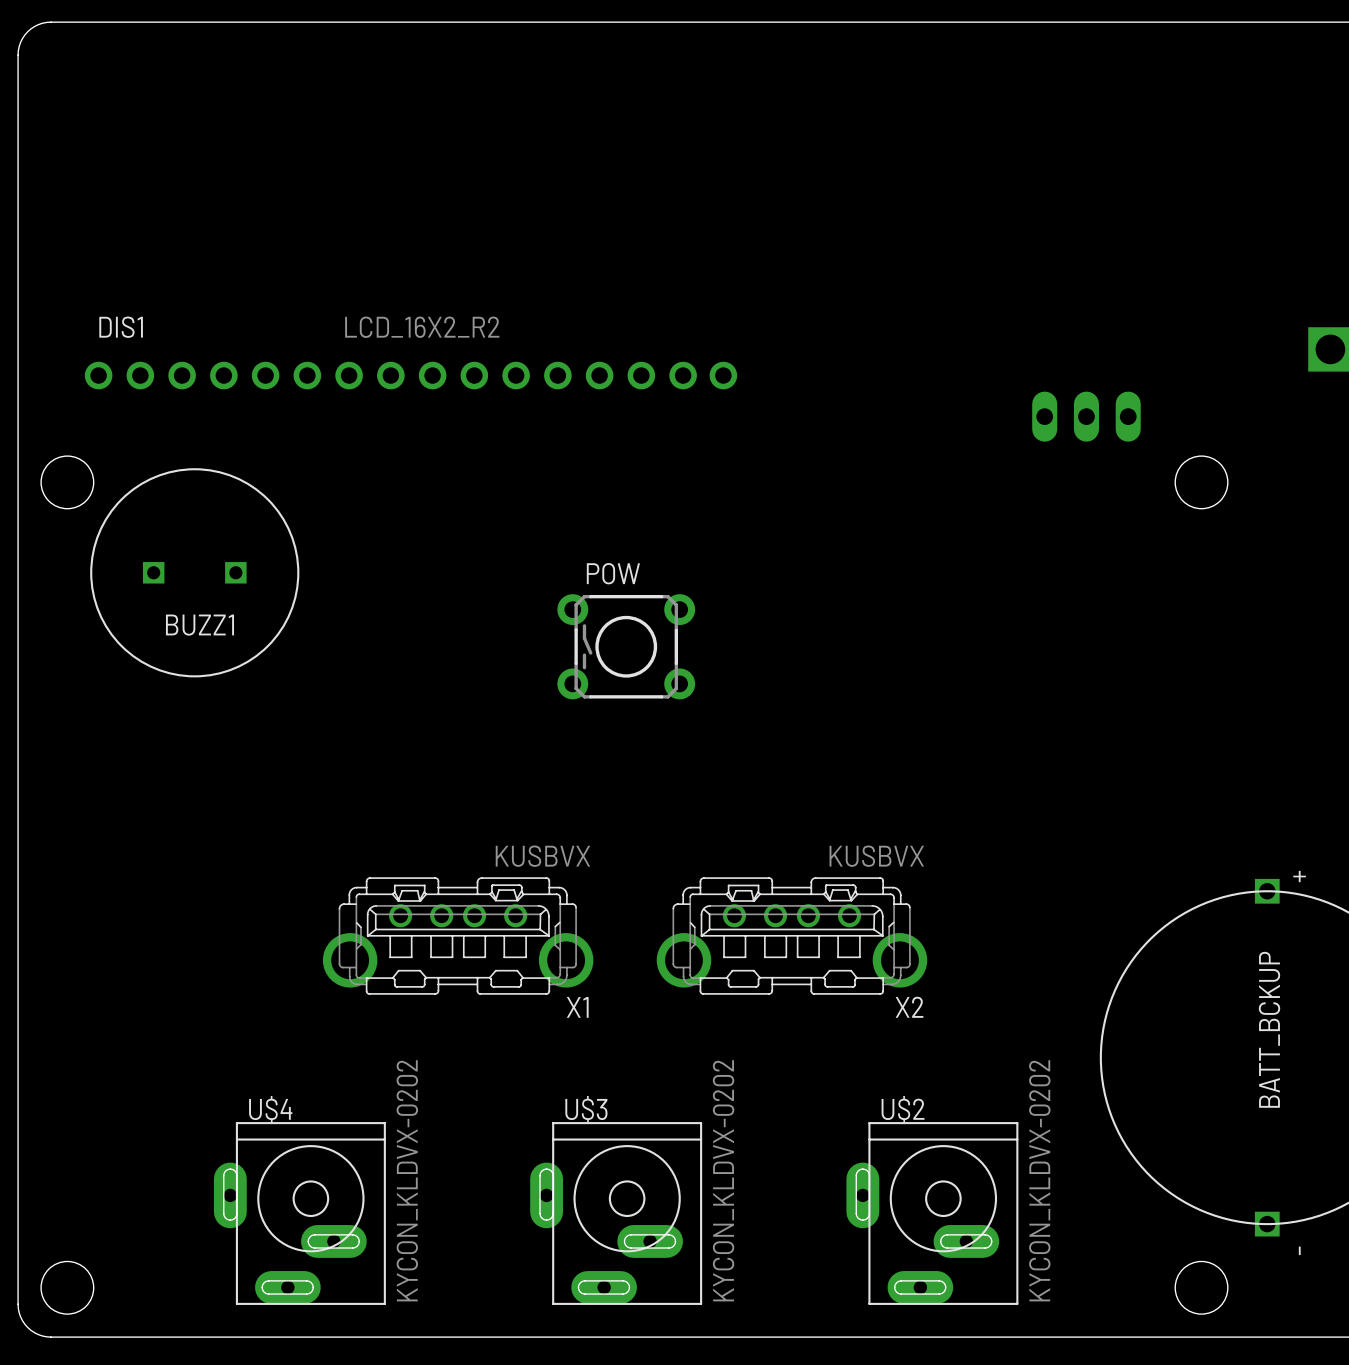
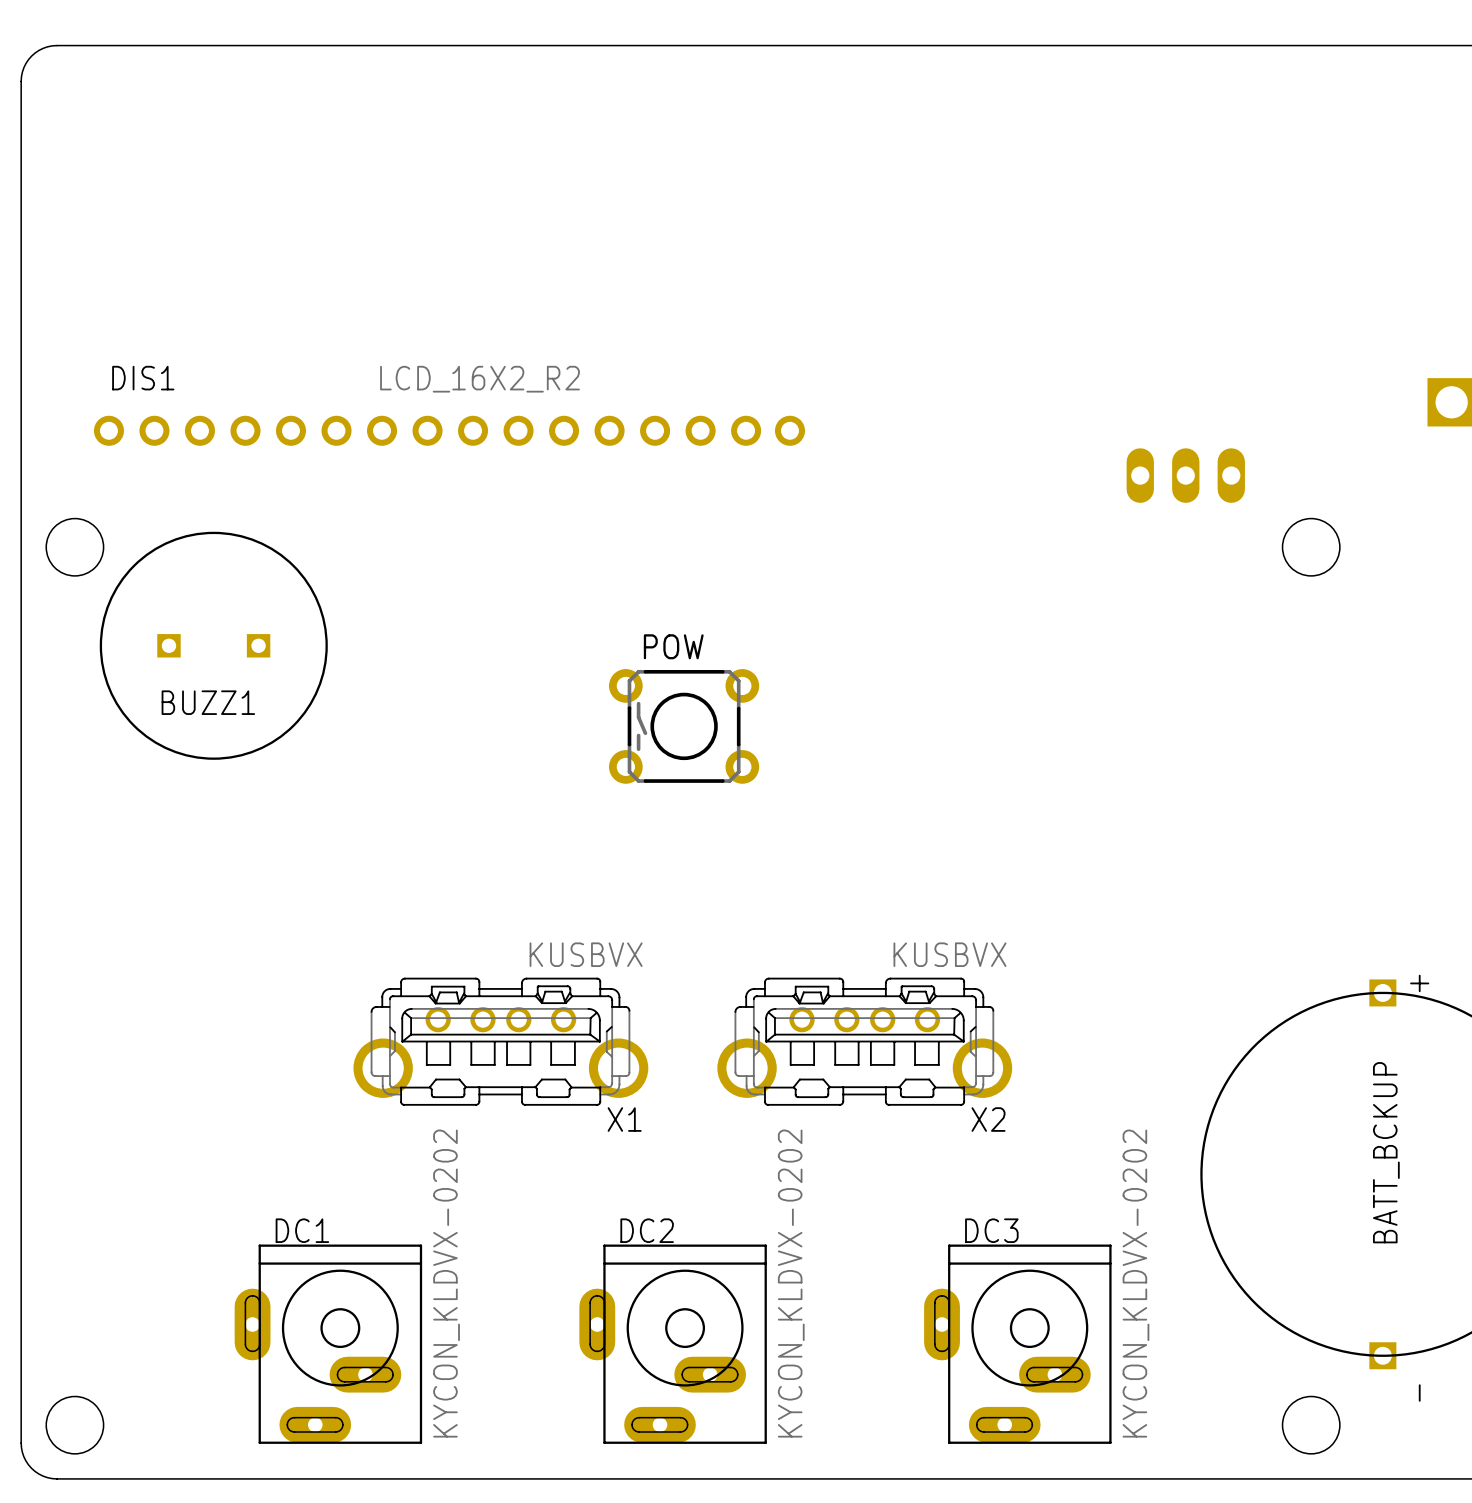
U$4 name: U$4 (270, 1109) -> DC1 (302, 1230)
U$3 name: U$3 (586, 1109) -> DC2 (647, 1230)
U$2 name: U$2 (903, 1109) -> DC3 (991, 1230)

